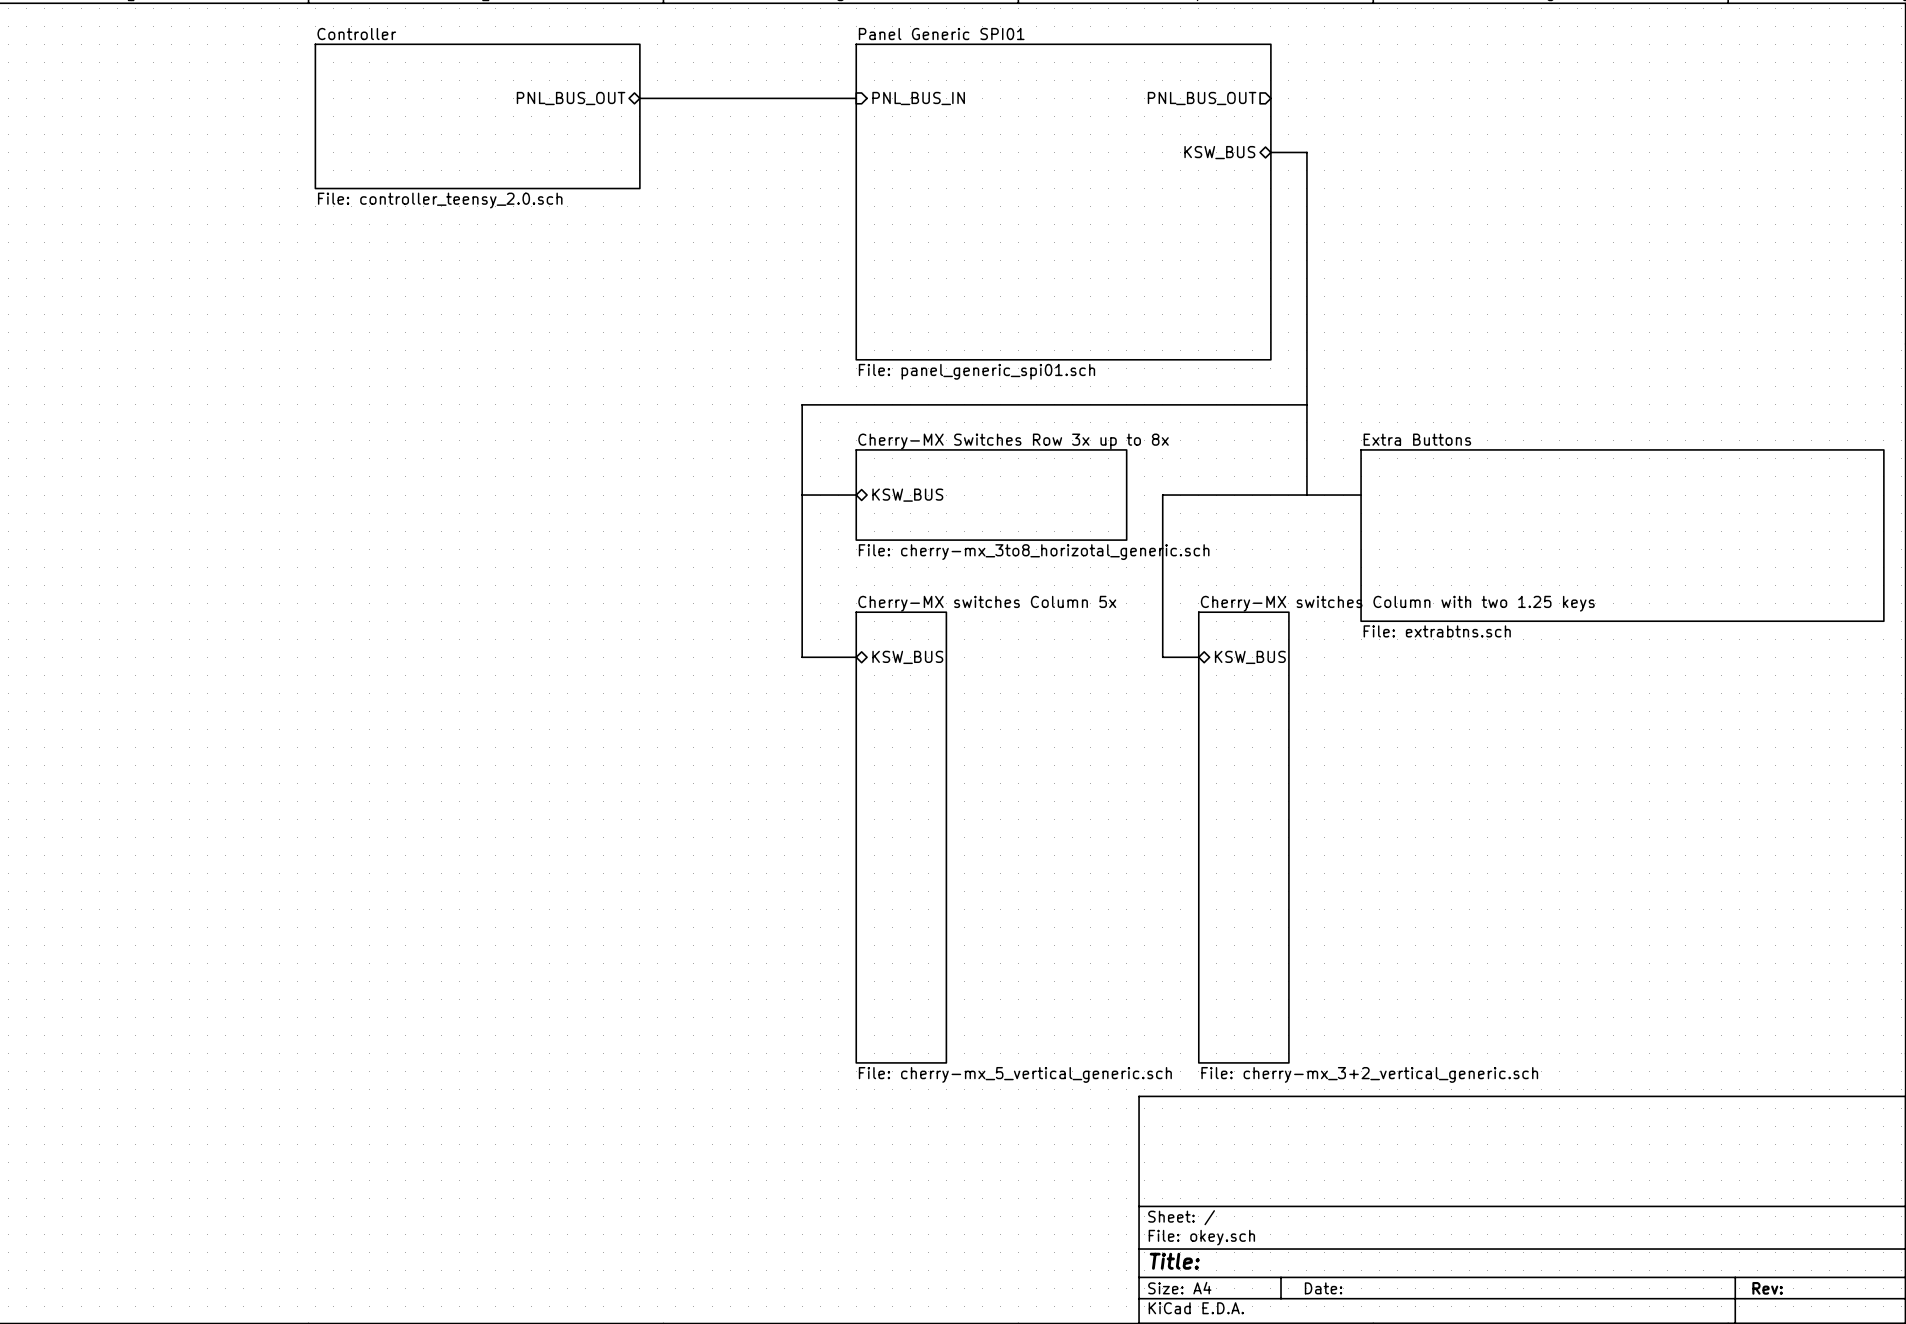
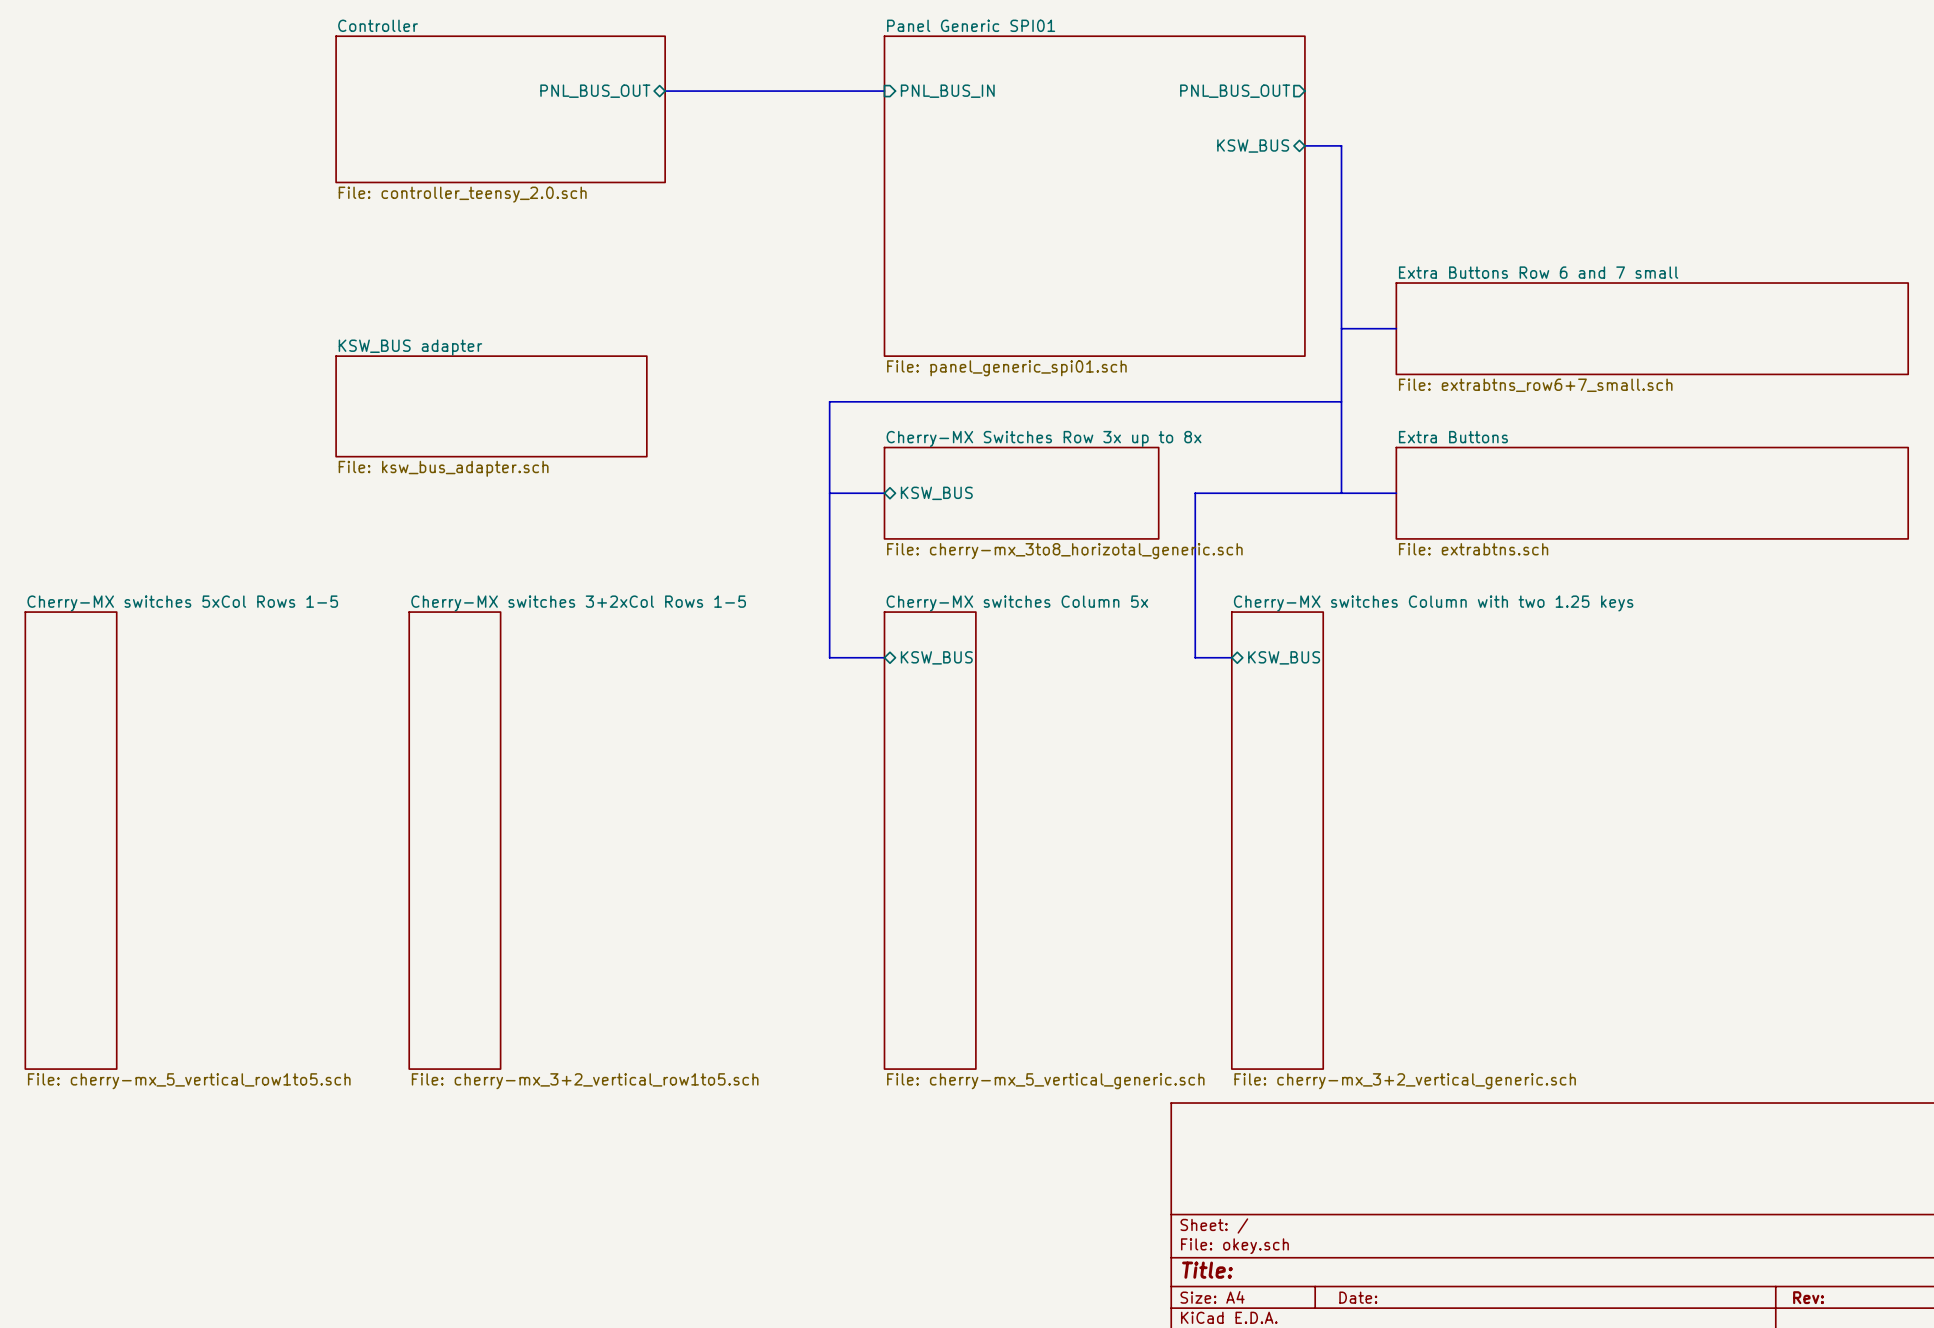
bus: none -> (1341, 328) (1396, 328)
sheet Extra Buttons Row 6 and 7 small: none -> File: extrabtns_row6+7_small.sch (1652, 328)
sheet KSW_BUS adapter: none -> File: ksw_bus_adapter.sch (491, 406)
sheet Extra Buttons: none -> File: extrabtns.sch (1652, 493)
sheet Extra Buttons: File: extrabtns.sch (1622, 535) -> none
sheet Cherry-MX switches 5xCol Rows 1-5: none -> File: cherry-mx_5_vertical_row1to5.sch (71, 840)
sheet Cherry-MX switches 3+2xCol Rows 1-5: none -> File: cherry-mx_3+2_vertical_row1to5.sch (454, 840)

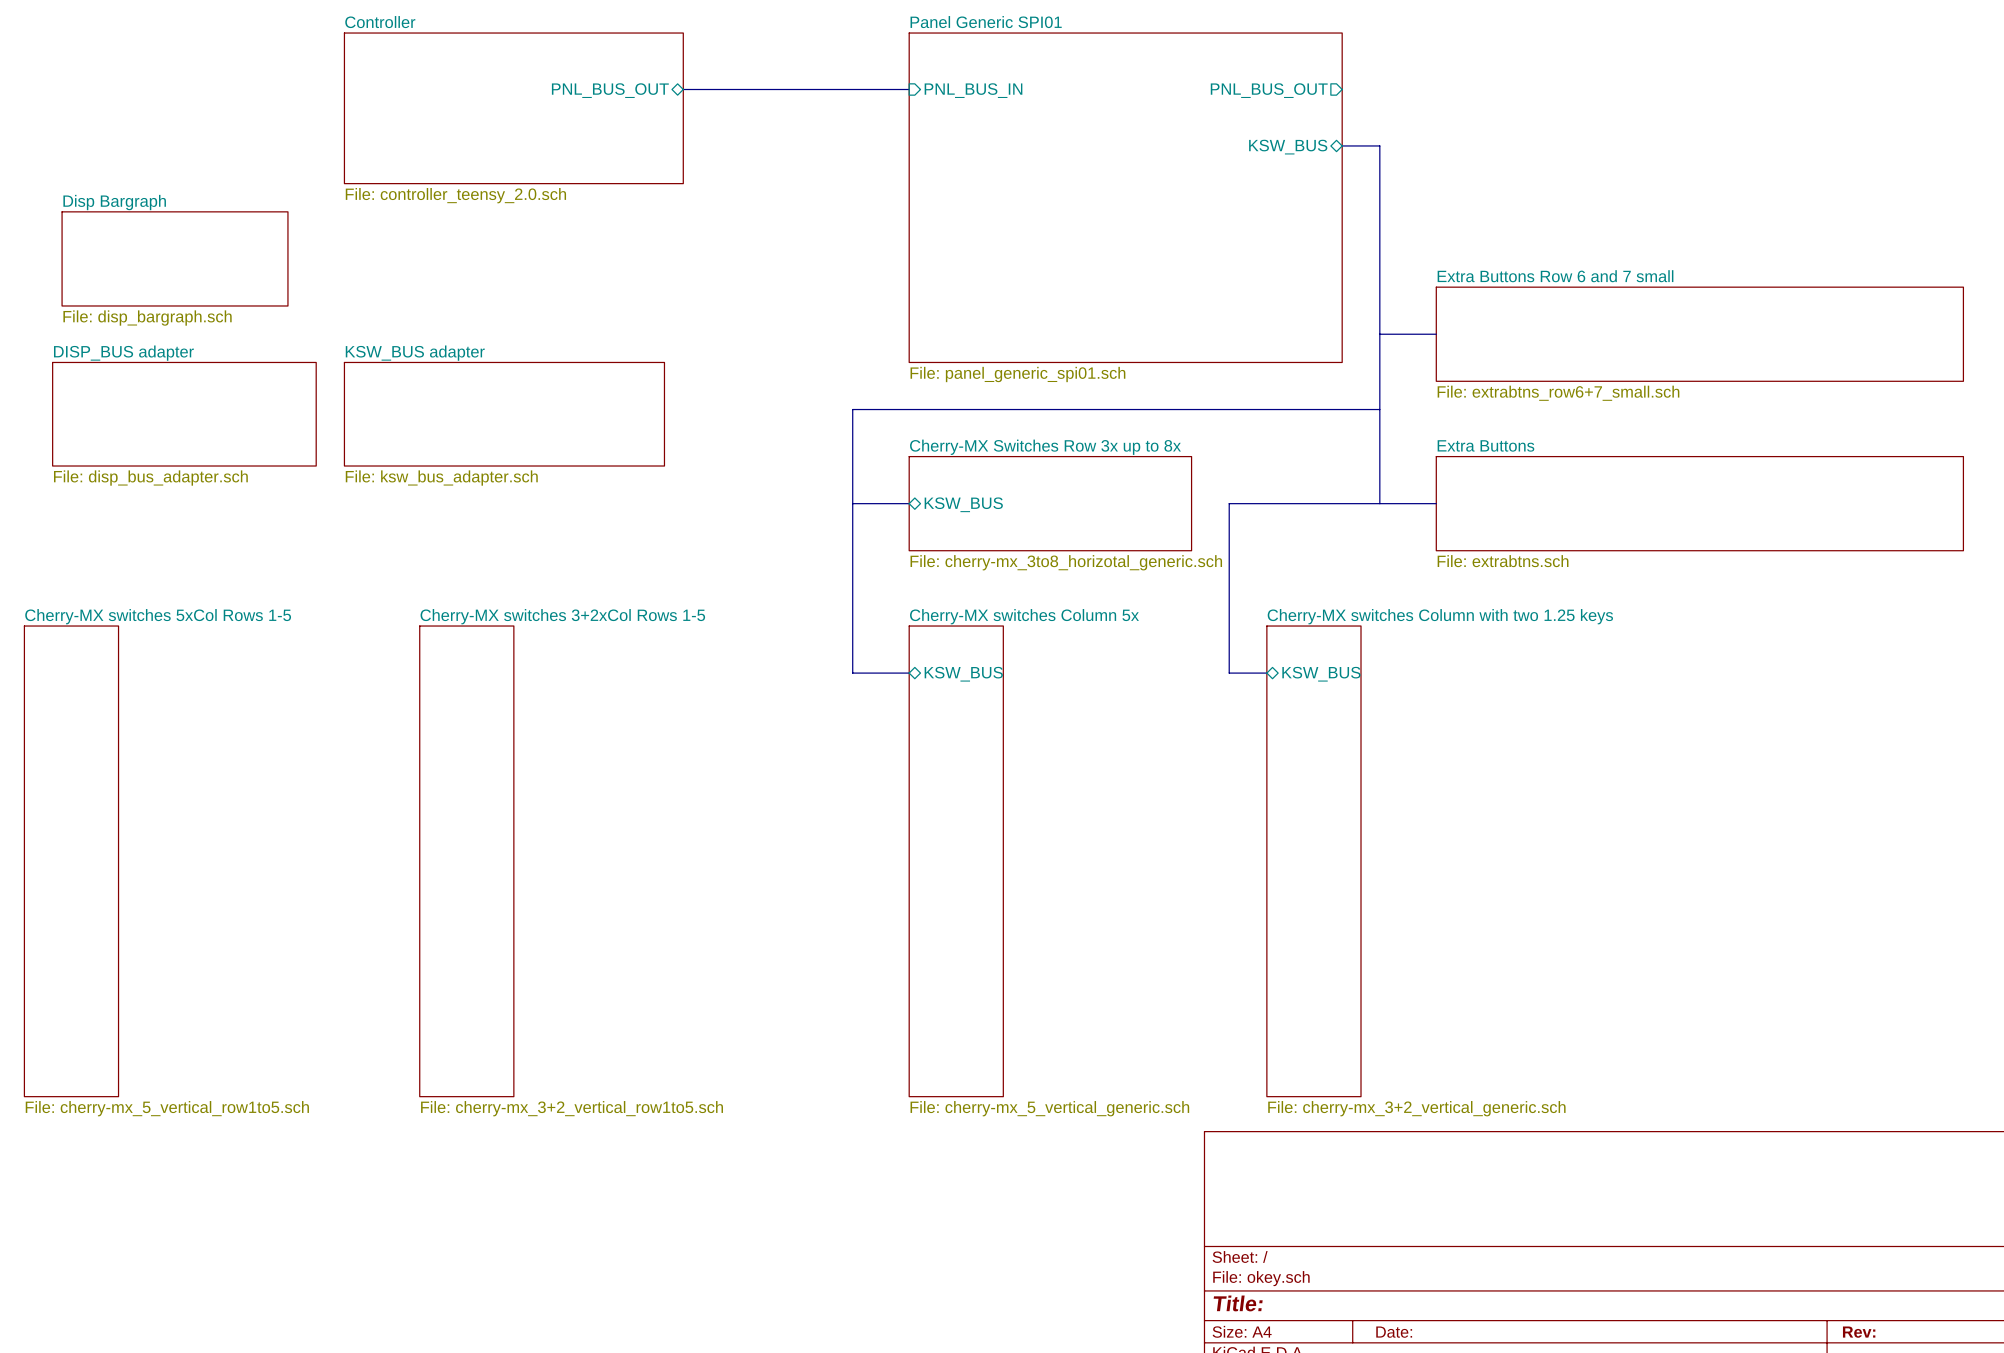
sheet Disp Bargraph: none -> File: disp_bargraph.sch (175, 258)
sheet DISP_BUS adapter: none -> File: disp_bus_adapter.sch (184, 414)

